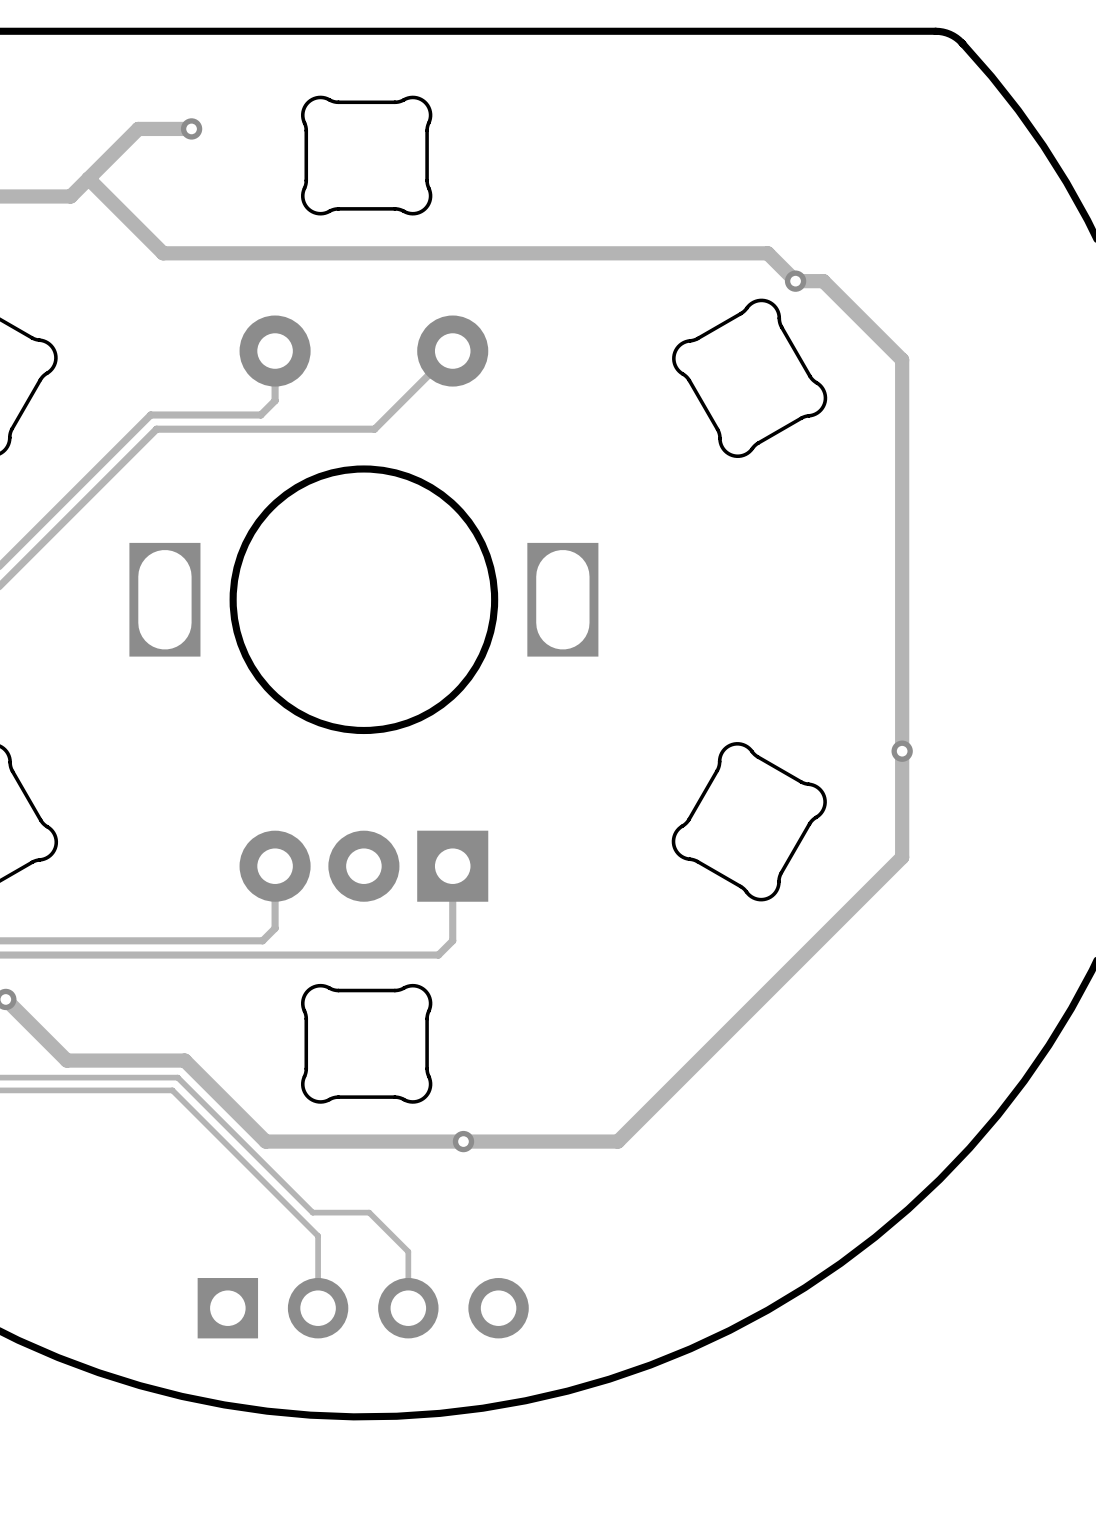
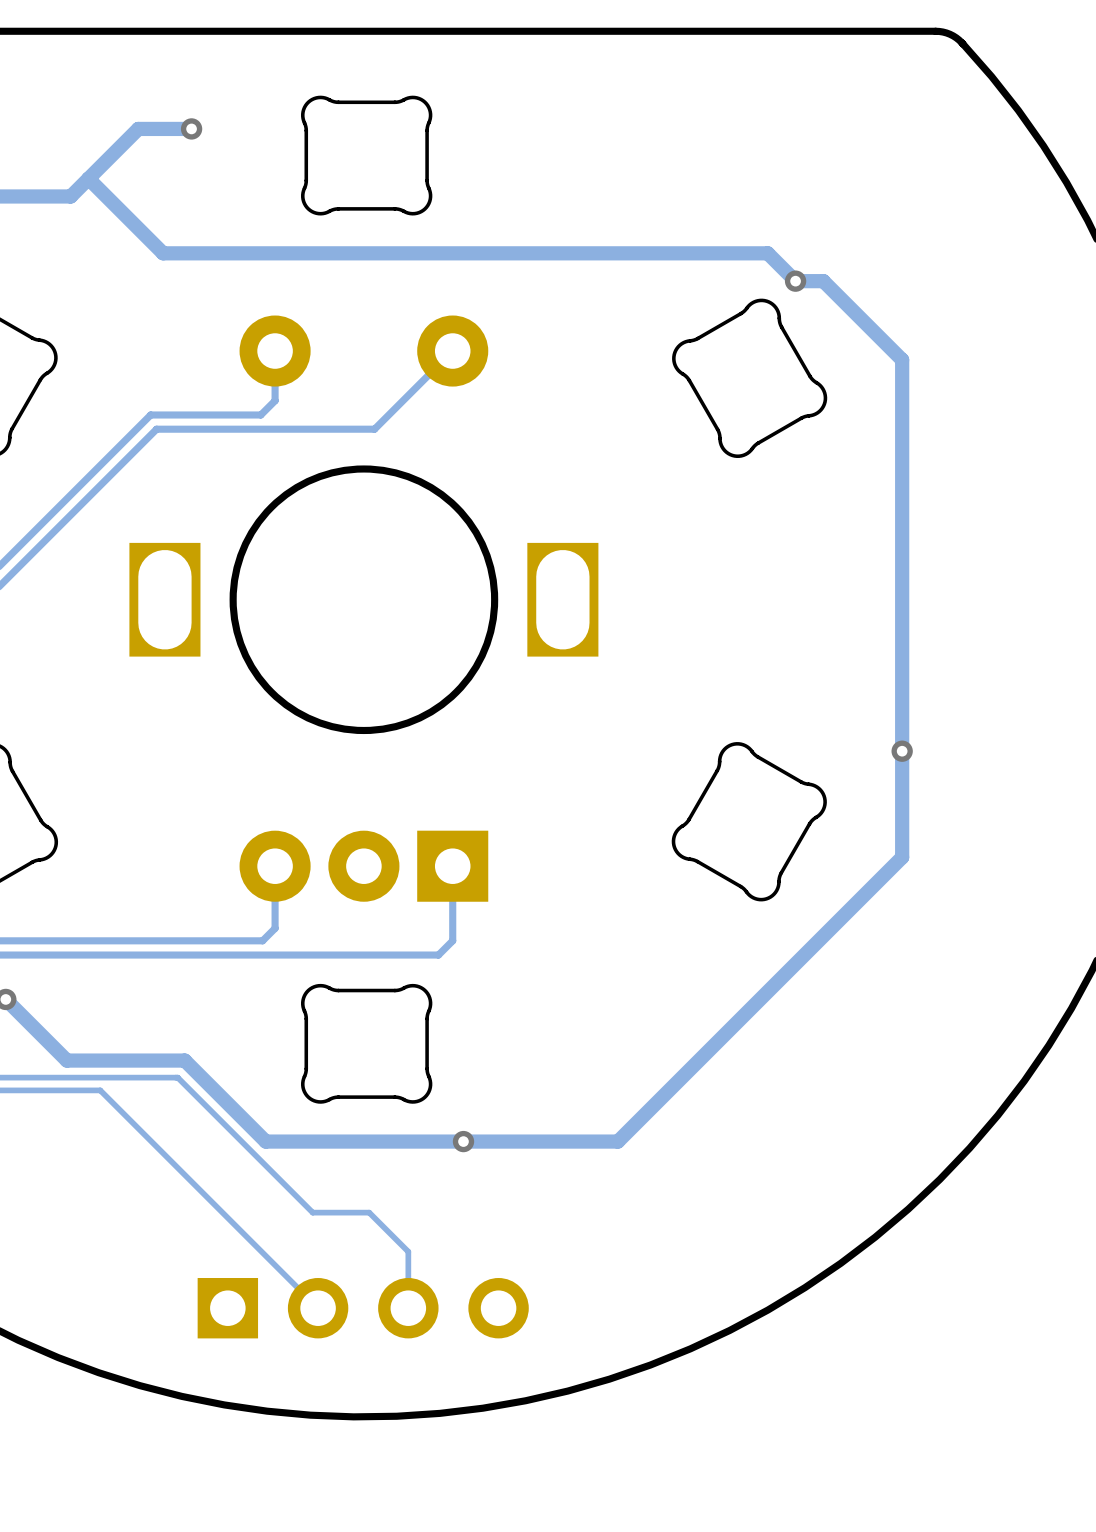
track: (100, 1090) (172, 1090) (318, 1236) (318, 1308) -> (100, 1090) (318, 1308)

